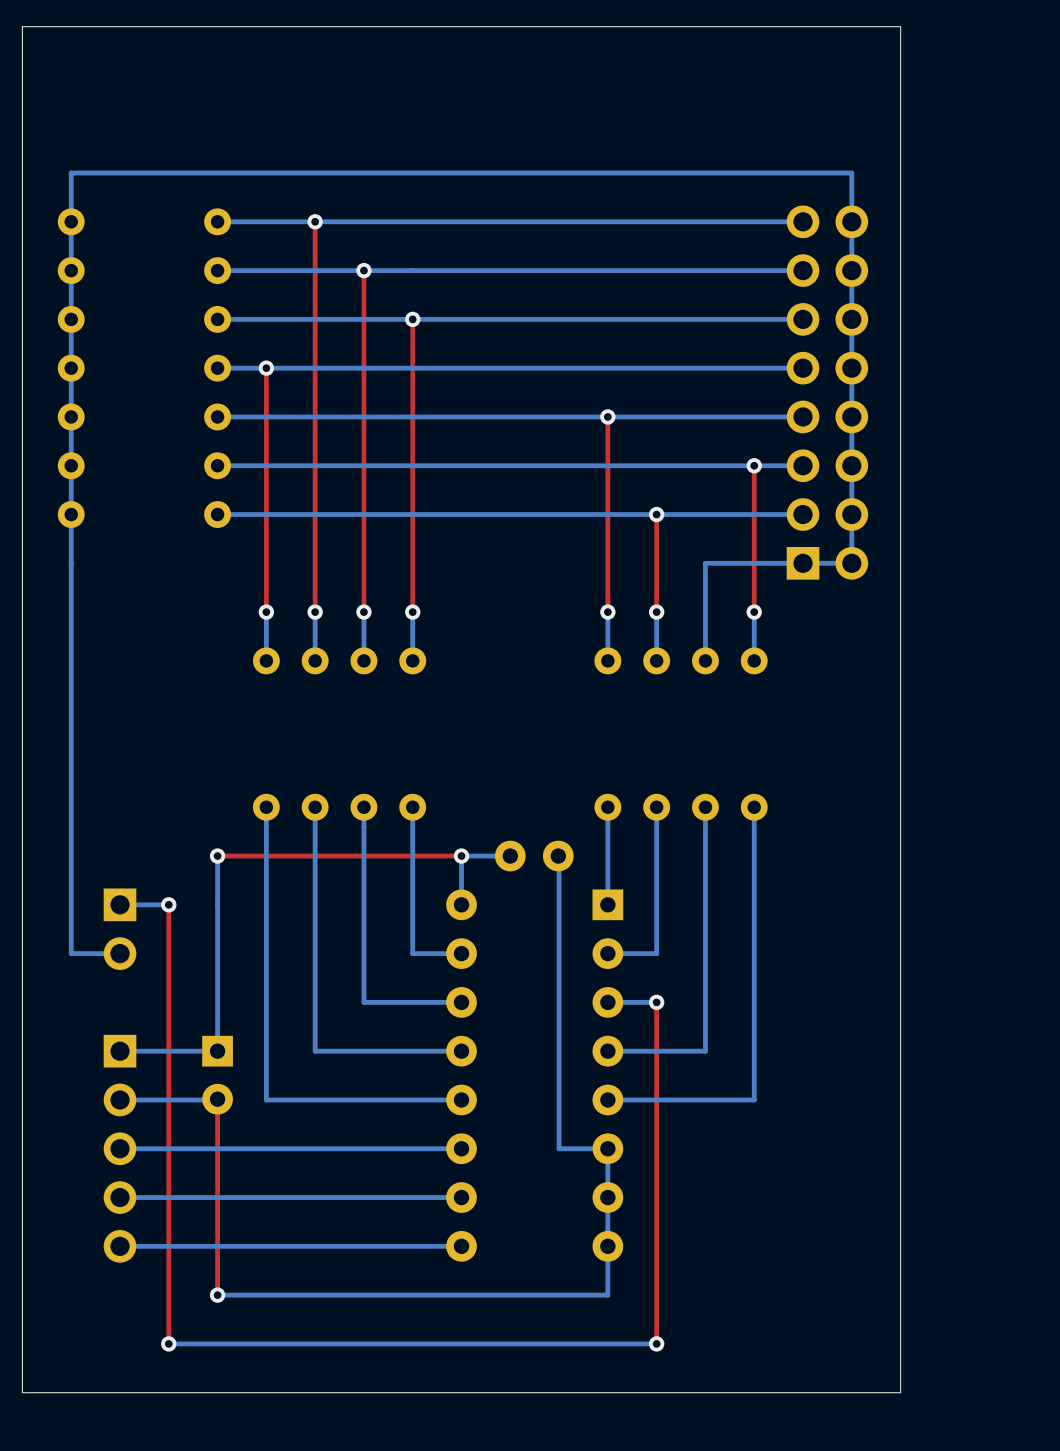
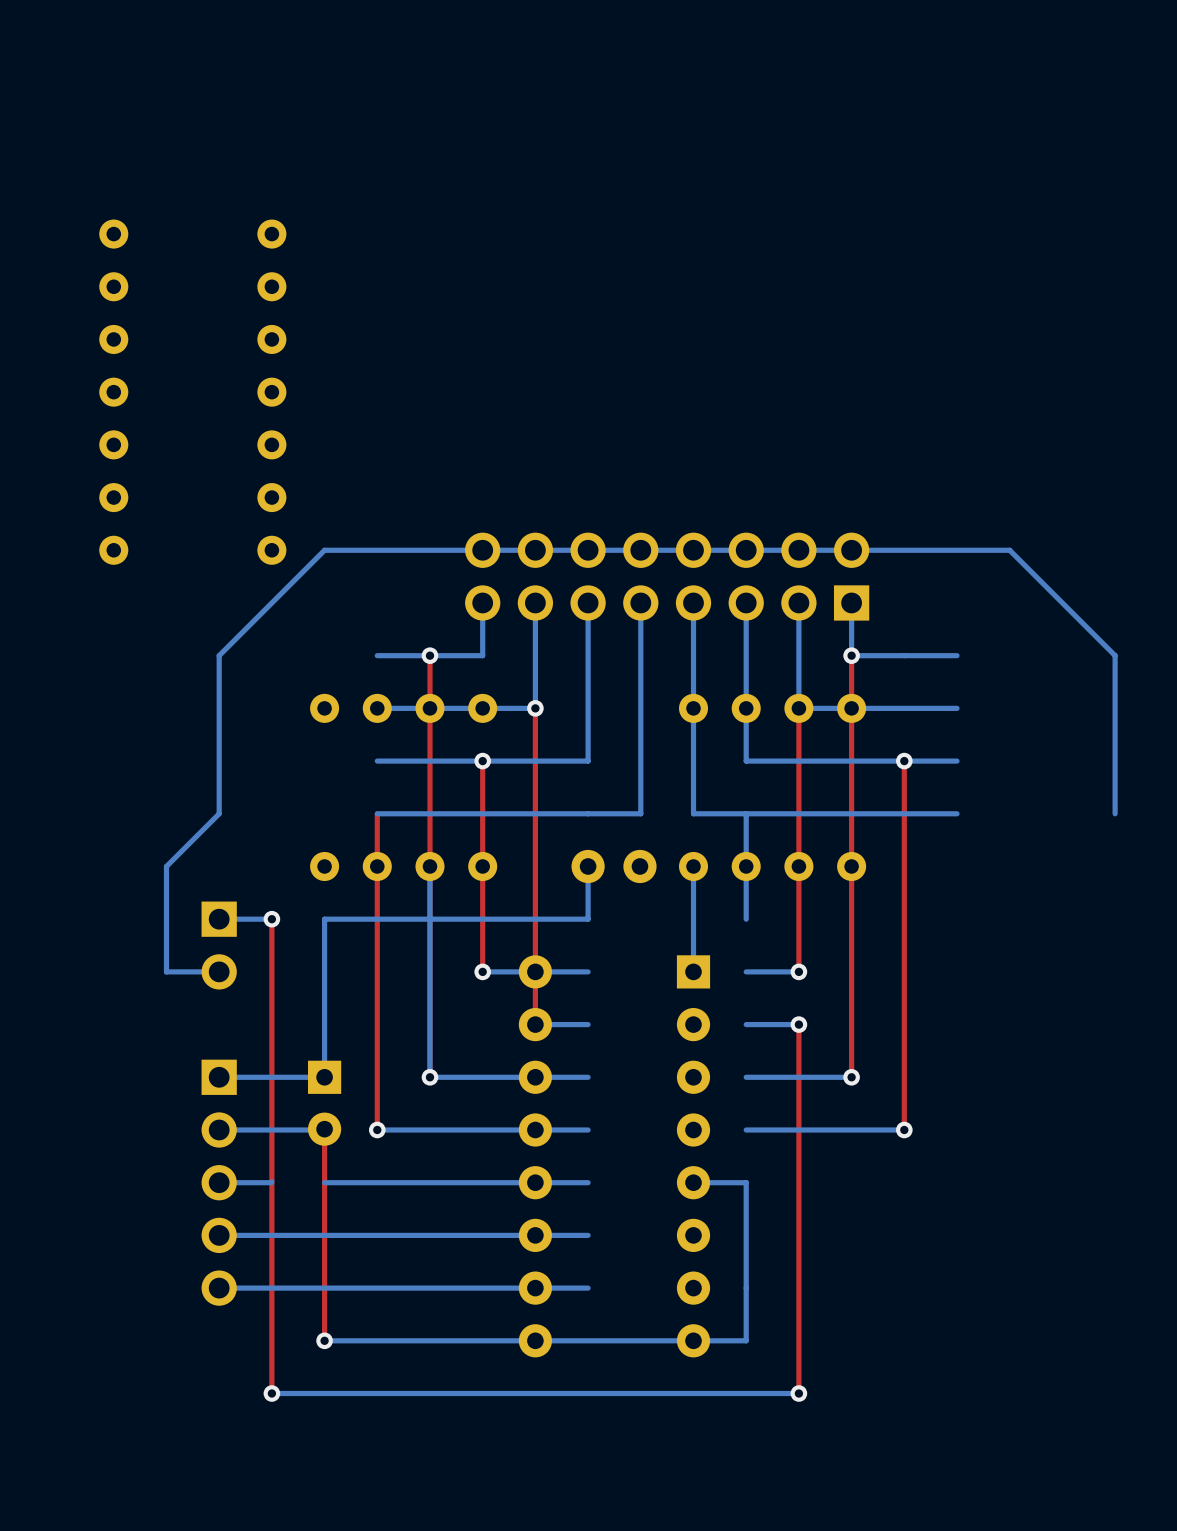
board edge: (900, 26) (900, 1392) (22, 1392) (22, 26) (900, 26) -> none
top track: (315, 221) (315, 612) -> none
via: (315, 221) -> none
bottom track: (803, 221) (217, 221) -> none
top track: (363, 270) (363, 612) -> (429, 1077) (429, 655)
via: (363, 270) -> none
bottom track: (803, 270) (217, 270) -> none
top track: (412, 319) (412, 612) -> (535, 708) (535, 1024)
via: (412, 319) -> none
bottom track: (803, 319) (217, 319) -> none
top track: (266, 368) (266, 612) -> none
via: (266, 368) -> none
bottom track: (803, 368) (217, 368) -> none
part rotation: 0° (827, 392) -> 90° counterclockwise (667, 576)
part position: (827, 392) -> (667, 576)
top track: (607, 416) (607, 612) -> (482, 761) (482, 971)
via: (607, 416) -> none
bottom track: (803, 416) (217, 416) -> none
top track: (754, 465) (754, 612) -> (851, 1077) (851, 655)
via: (754, 465) -> none
bottom track: (803, 465) (217, 465) -> none
bottom track: (266, 514) (217, 514) -> (324, 550) (219, 655) (219, 813) (166, 866) (166, 971)
top track: (656, 514) (656, 612) -> none
via: (656, 514) -> none
bottom track: none -> (904, 550) (1009, 550) (1115, 655) (1115, 813)
bottom track: none -> (535, 602) (535, 708) (377, 708)
bottom track: none -> (588, 602) (588, 761) (377, 761)
bottom track: none -> (640, 602) (640, 813) (377, 813)
bottom track: (705, 563) (851, 563) (851, 173) (71, 173) (71, 953) (120, 953) -> none
bottom track: none -> (851, 602) (851, 655) (957, 655)
bottom track: (266, 612) (266, 660) -> (693, 602) (693, 655)
via: (266, 612) -> none
bottom track: (315, 612) (315, 660) -> (377, 655) (482, 655) (482, 602)
via: (315, 612) -> none
bottom track: (363, 612) (363, 660) -> (588, 866) (588, 919)
bottom track: (412, 612) (412, 660) -> (746, 602) (746, 655)
via: (412, 612) -> none
via: (607, 612) -> none
via: (656, 612) -> none
bottom track: (754, 612) (754, 660) -> none
via: none -> (535, 708)
bottom track: none -> (693, 708) (693, 813) (957, 813)
bottom track: none -> (746, 708) (746, 761) (957, 761)
top track: none -> (798, 708) (798, 971)
bottom track: none -> (957, 708) (798, 708)
via: none -> (482, 761)
top track: none -> (904, 761) (904, 1129)
via: none -> (904, 761)
top track: none -> (377, 813) (377, 1129)
bottom track: (266, 807) (266, 856) -> (746, 813) (746, 866)
bottom track: (315, 807) (315, 1051) -> none
bottom track: (412, 807) (412, 953) (461, 953) -> (588, 1024) (535, 1024)
bottom track: (705, 807) (705, 1051) -> (904, 1129) (798, 1129)
bottom track: (754, 807) (754, 1099) (656, 1099) -> (535, 1340) (746, 1340) (746, 1182)
bottom track: (217, 856) (217, 1051) -> (324, 1129) (271, 1129)
bottom track: none -> (271, 919) (219, 919)
bottom track: (461, 856) (461, 904) -> (535, 919) (324, 919)
top track: (461, 856) (217, 856) -> (271, 1181) (271, 919)
via: (461, 856) -> none
part position: (534, 856) -> (614, 866)
bottom track: (559, 856) (559, 1148) (607, 1148) (607, 1295) -> (798, 1393) (693, 1393)
bottom track: (656, 856) (656, 953) (607, 953) -> none
top track: (168, 904) (168, 1343) -> none
via: (168, 904) -> none
via: none -> (482, 971)
bottom track: none -> (588, 971) (482, 971)
bottom track: none -> (798, 971) (746, 971)
via: none -> (798, 971)
part position: (120, 929) -> (219, 945)
via: none -> (798, 1024)
bottom track: (266, 1002) (266, 1099) -> (324, 1077) (219, 1077)
via: none -> (429, 1077)
bottom track: (656, 1002) (607, 1002) -> (746, 1077) (851, 1077)
top track: (656, 1002) (656, 1343) -> (798, 1024) (798, 1393)
via: (656, 1002) -> none
via: none -> (851, 1077)
top track: none -> (324, 1129) (324, 1340)
bottom track: (168, 1051) (120, 1051) -> (588, 1077) (535, 1077)
via: none -> (377, 1129)
bottom track: (656, 1051) (607, 1051) -> (798, 1024) (746, 1024)
via: none -> (904, 1129)
part position: (217, 1075) -> (324, 1103)
bottom track: (168, 1099) (120, 1099) -> (588, 1129) (535, 1129)
part position: (120, 1148) -> (219, 1182)
bottom track: (168, 1148) (120, 1148) -> (588, 1182) (535, 1182)
bottom track: (168, 1197) (120, 1197) -> (588, 1235) (535, 1235)
bottom track: none -> (588, 1288) (535, 1288)
bottom track: (266, 1246) (120, 1246) -> none
via: none -> (324, 1340)
via: (168, 1343) -> none
bottom track: (656, 1343) (168, 1343) -> none
via position: (656, 1343) -> (798, 1393)

